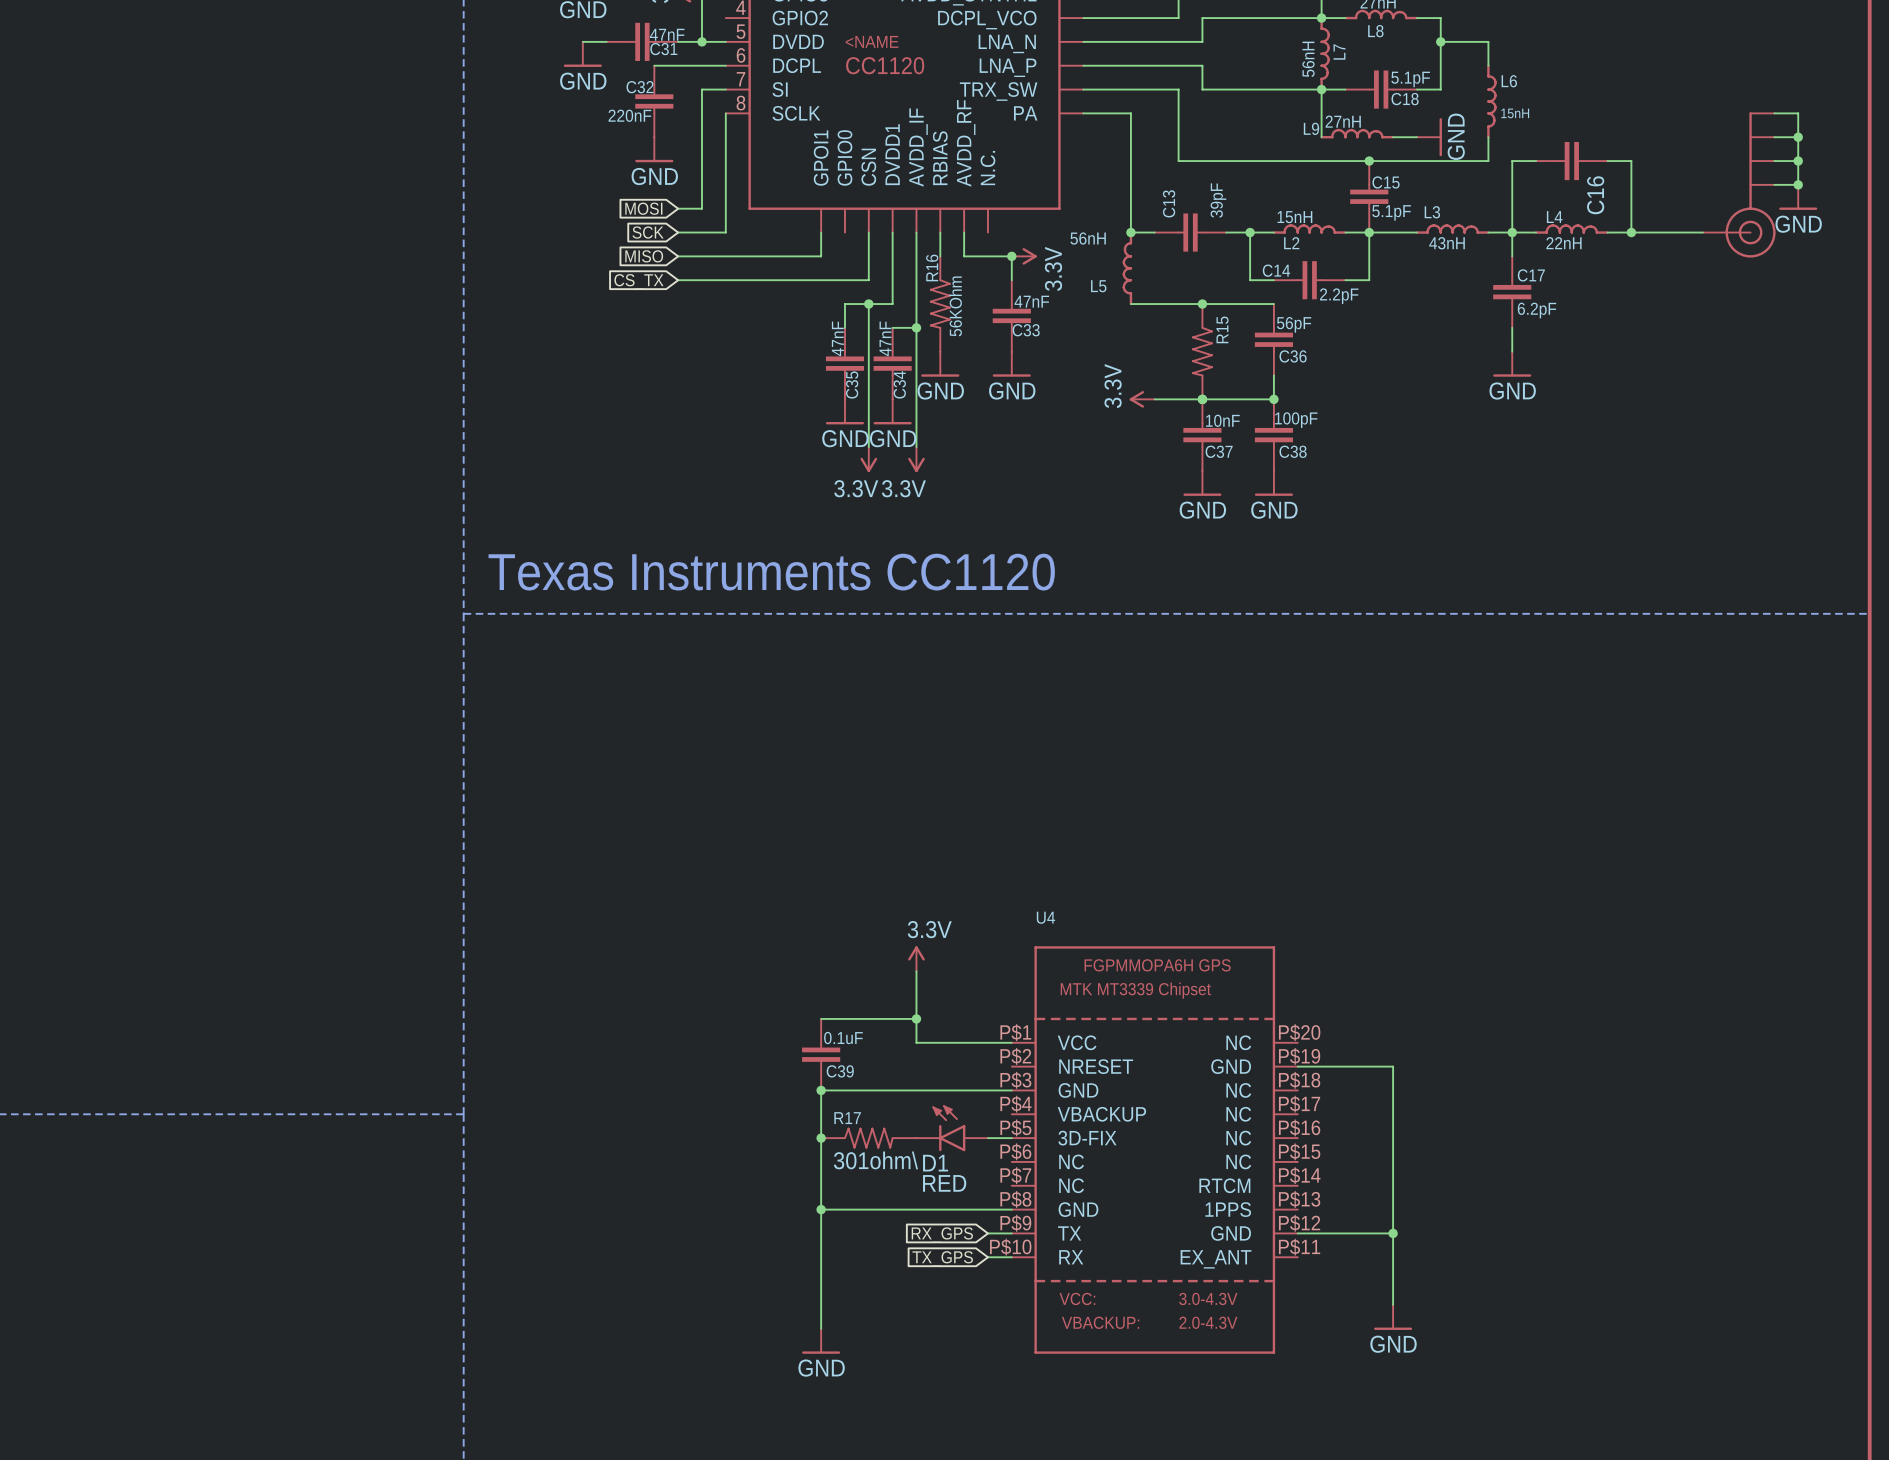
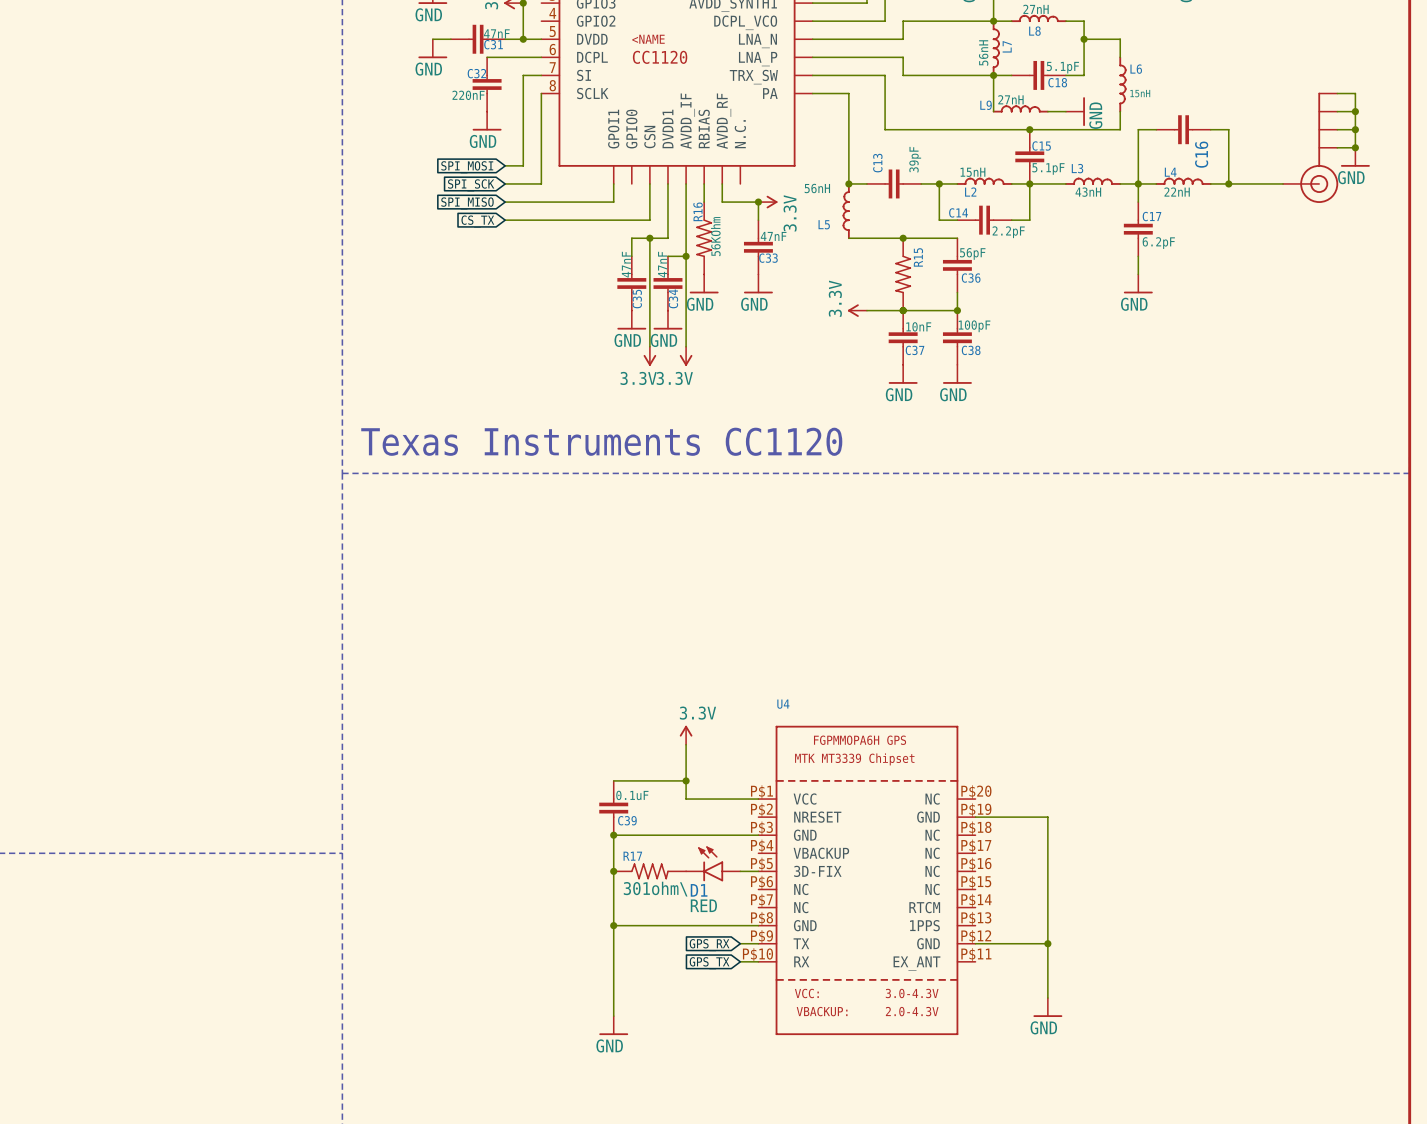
global label: MOSI (643, 208) -> SPI_MOSI (467, 167)
global label: SCK (648, 232) -> SPI_SCK (471, 185)
global label: MISO (644, 256) -> SPI_MISO (467, 203)
global label: RX_GPS (942, 1235) -> GPS_RX (709, 945)
global label: TX_GPS (942, 1258) -> GPS_TX (709, 963)

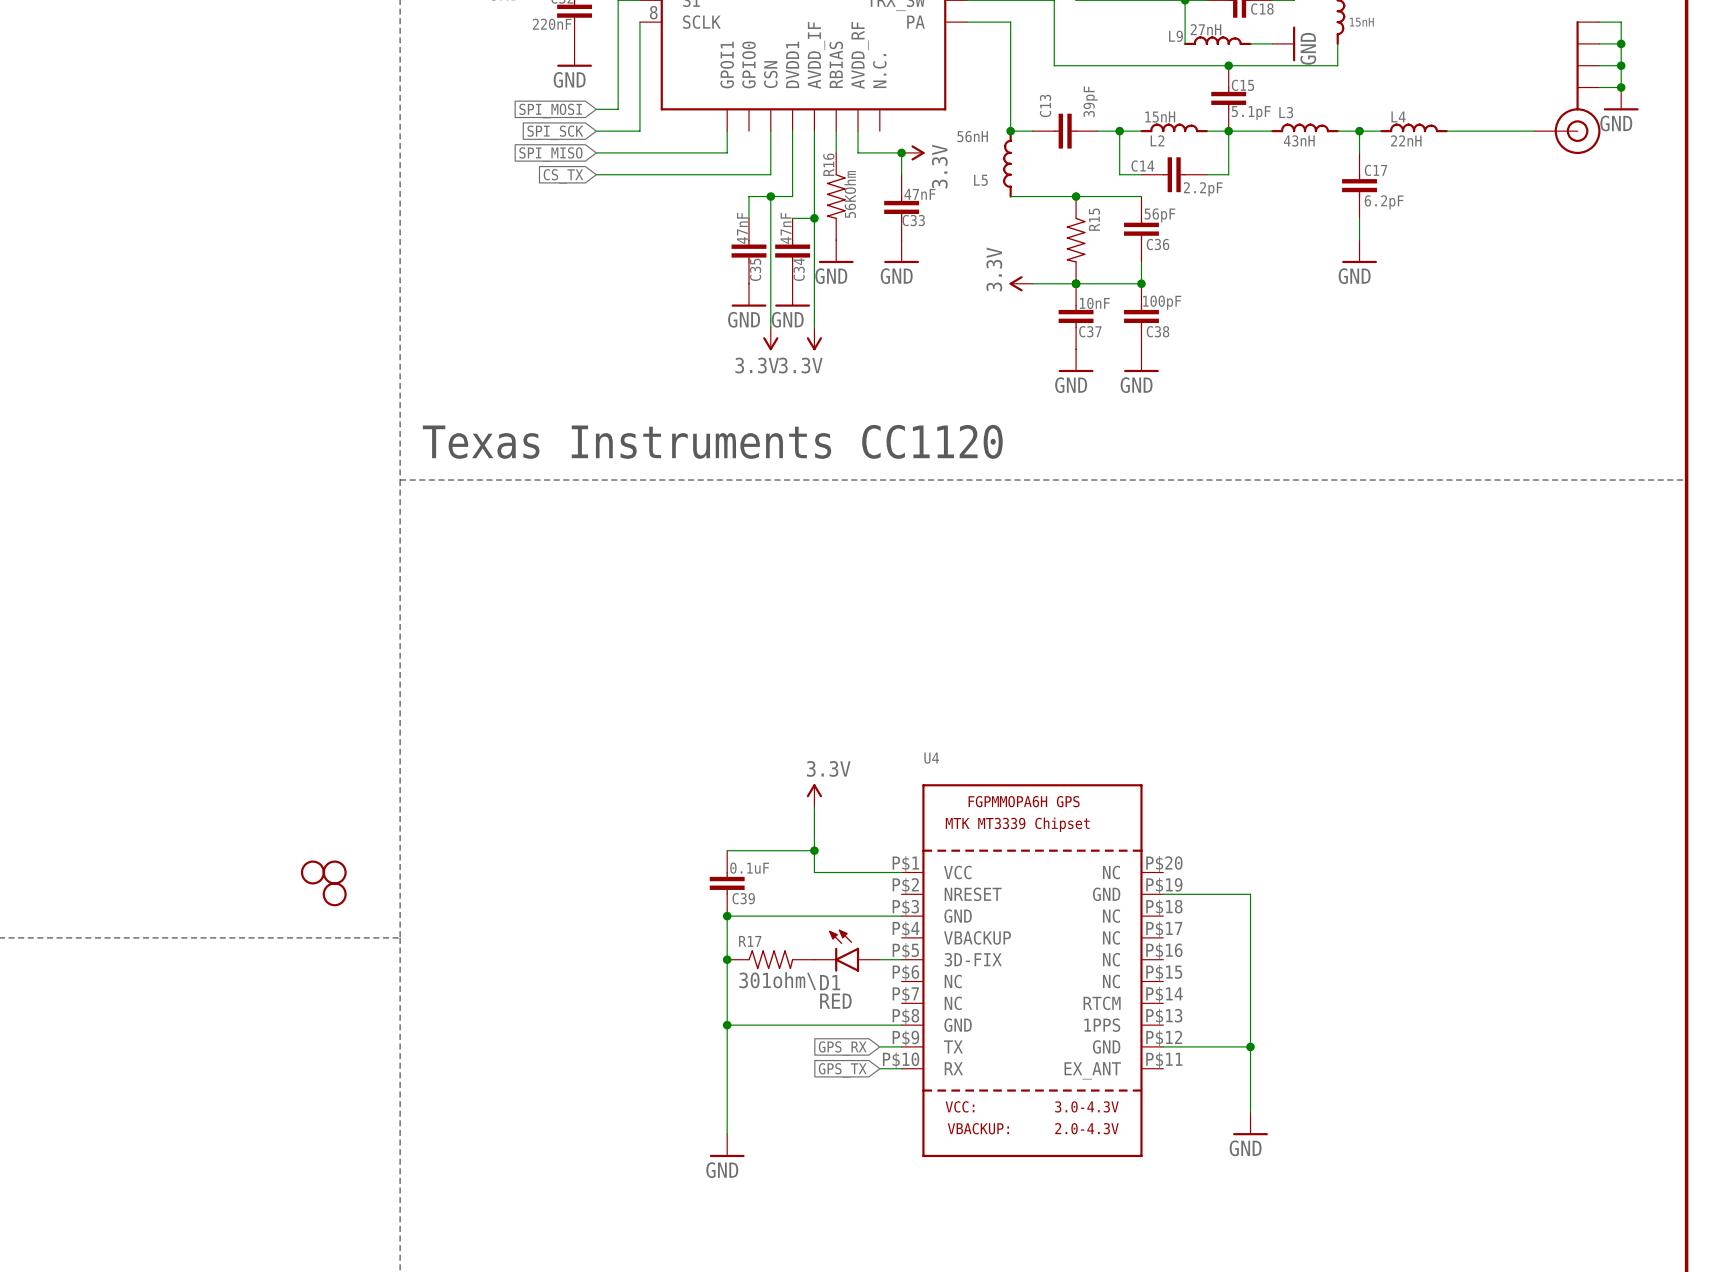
wire: (1156, 129) (1138, 129) (1138, 183) -> none
C16: (1183, 129) -> none
wire: (1210, 129) (1228, 129) (1228, 183) -> none
junction: (1228, 183) -> none
part: none -> (312, 872)
part: none -> (334, 872)
part: none -> (334, 894)

